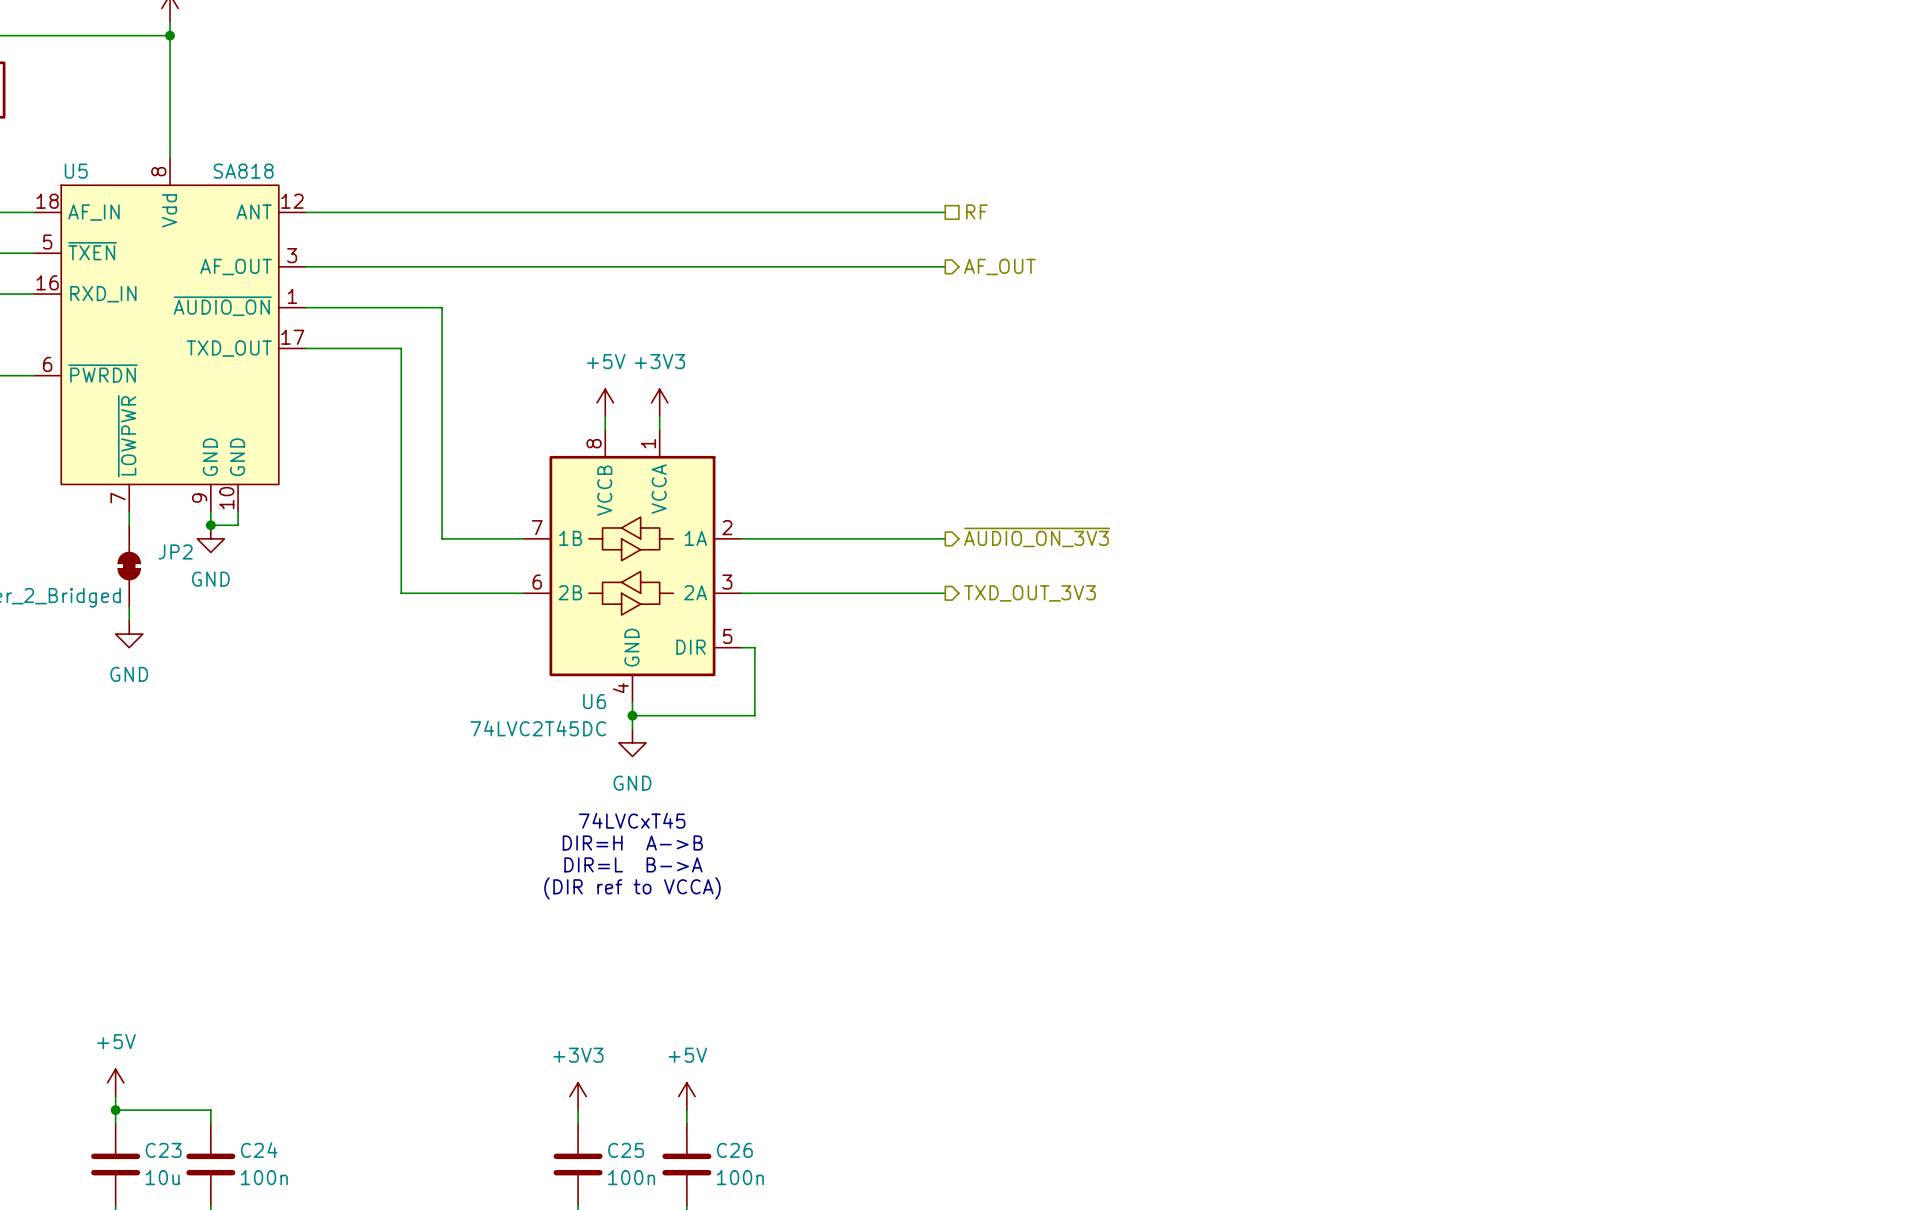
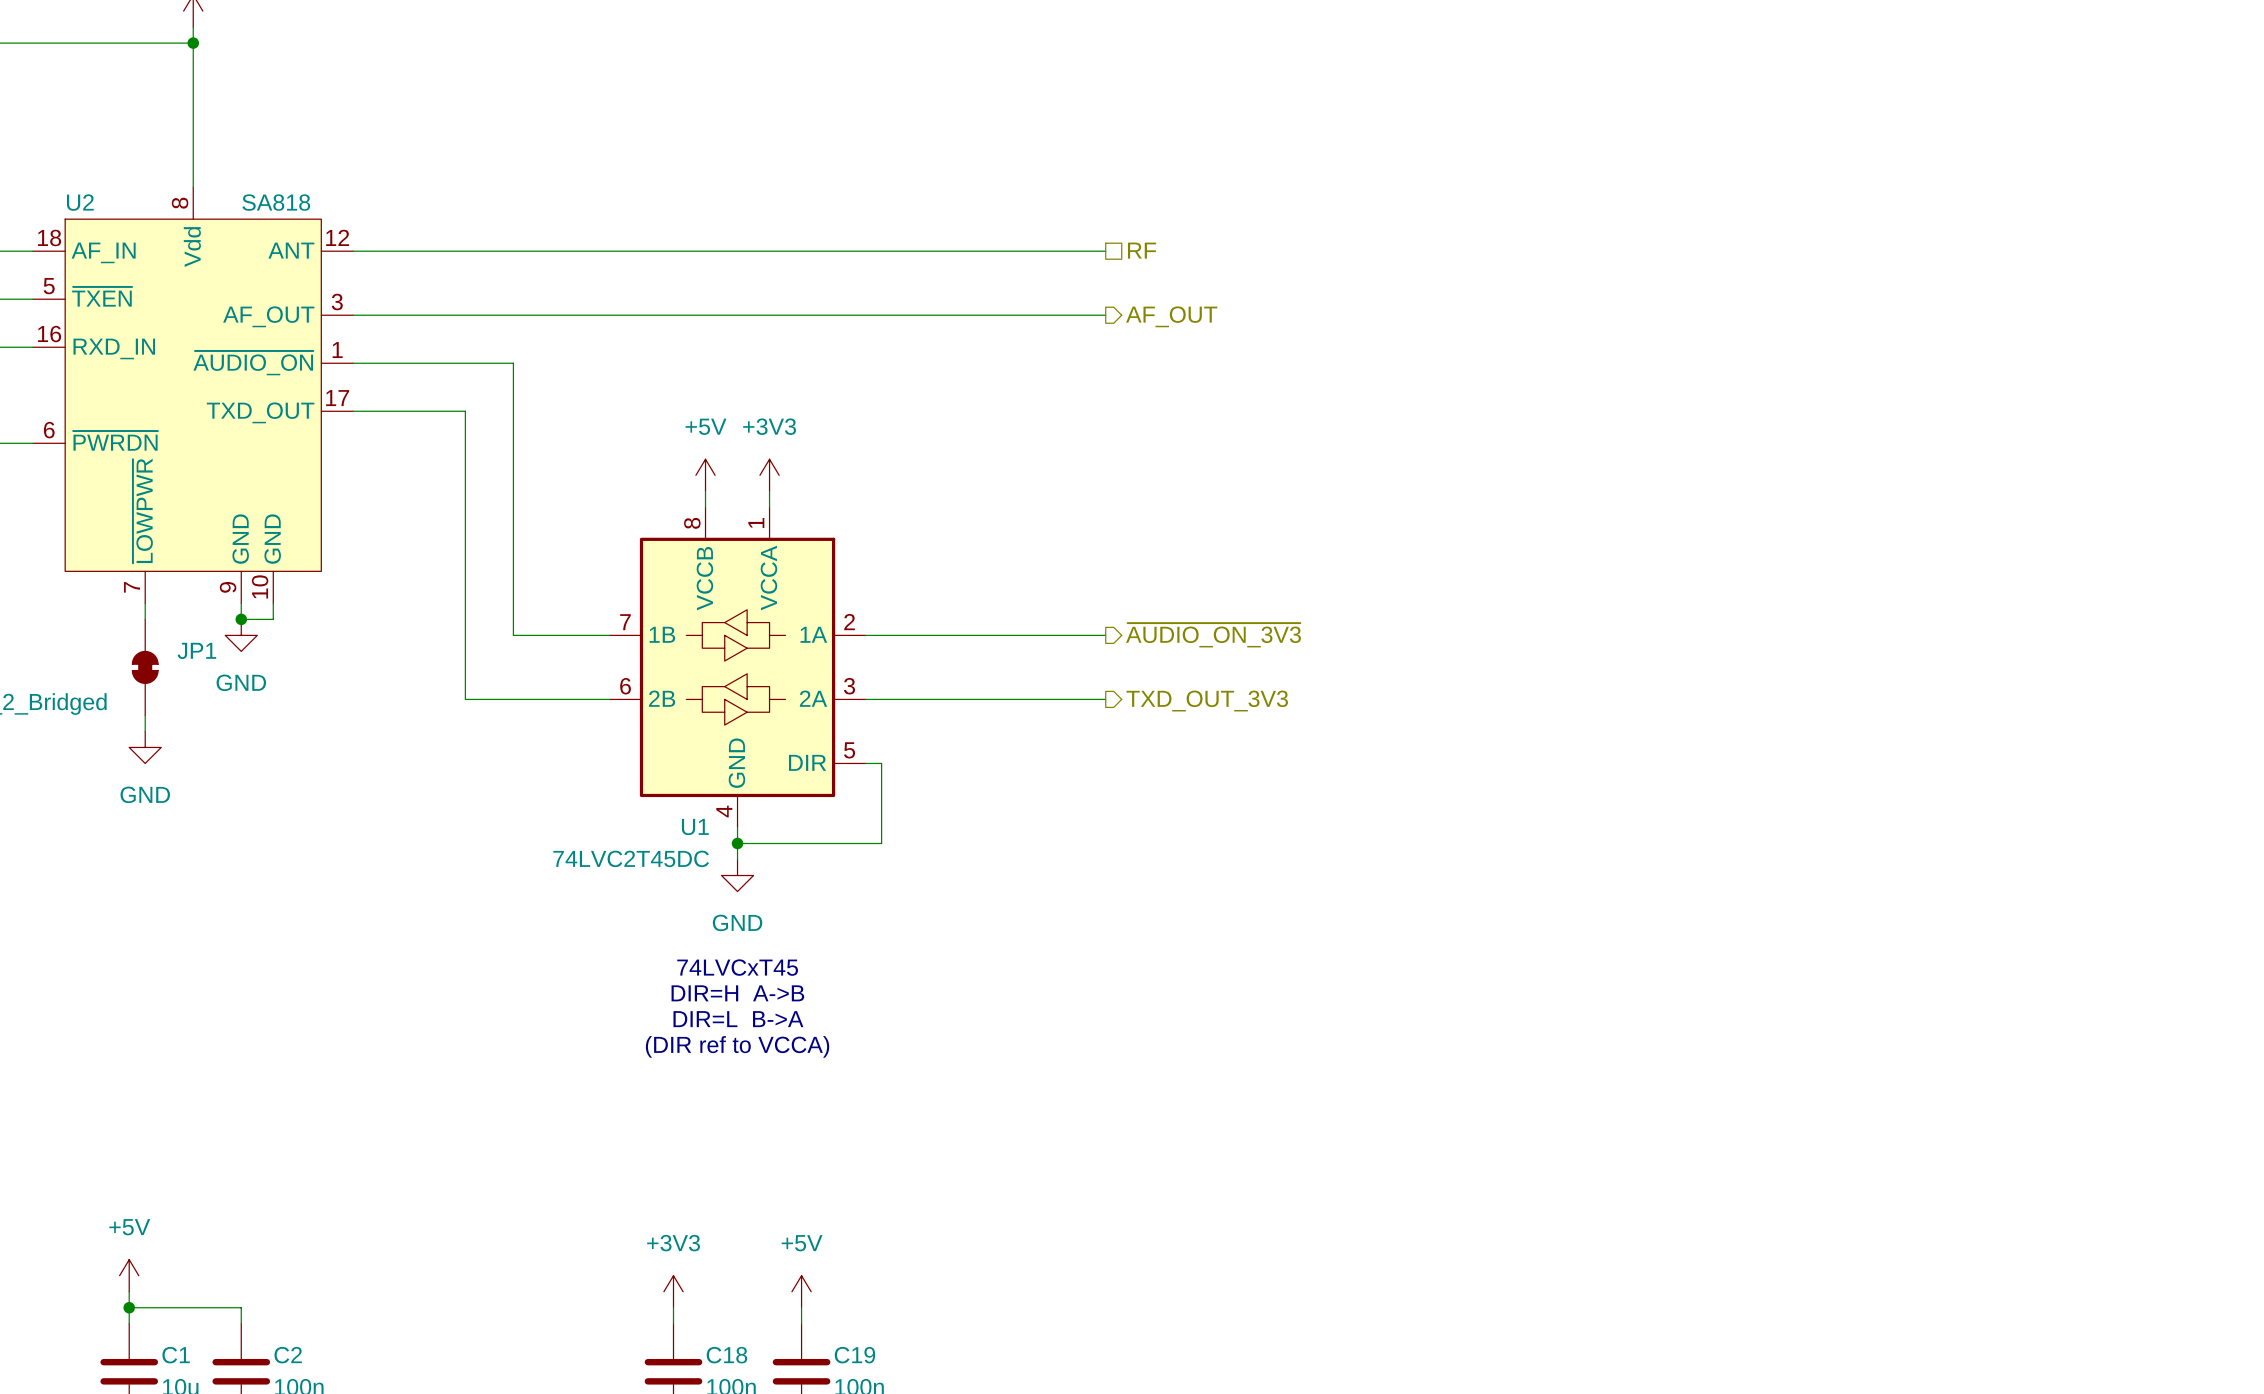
U5 name: U5 (76, 171) -> U2 (80, 202)
JP2 name: JP2 (175, 551) -> JP1 (196, 650)
U6 name: U6 (594, 701) -> U1 (695, 827)
C23 name: C23 (163, 1150) -> C1 (176, 1355)
C24 name: C24 (259, 1150) -> C2 (288, 1355)
C25 name: C25 (626, 1150) -> C18 (726, 1355)
C26 name: C26 (734, 1150) -> C19 (854, 1355)

